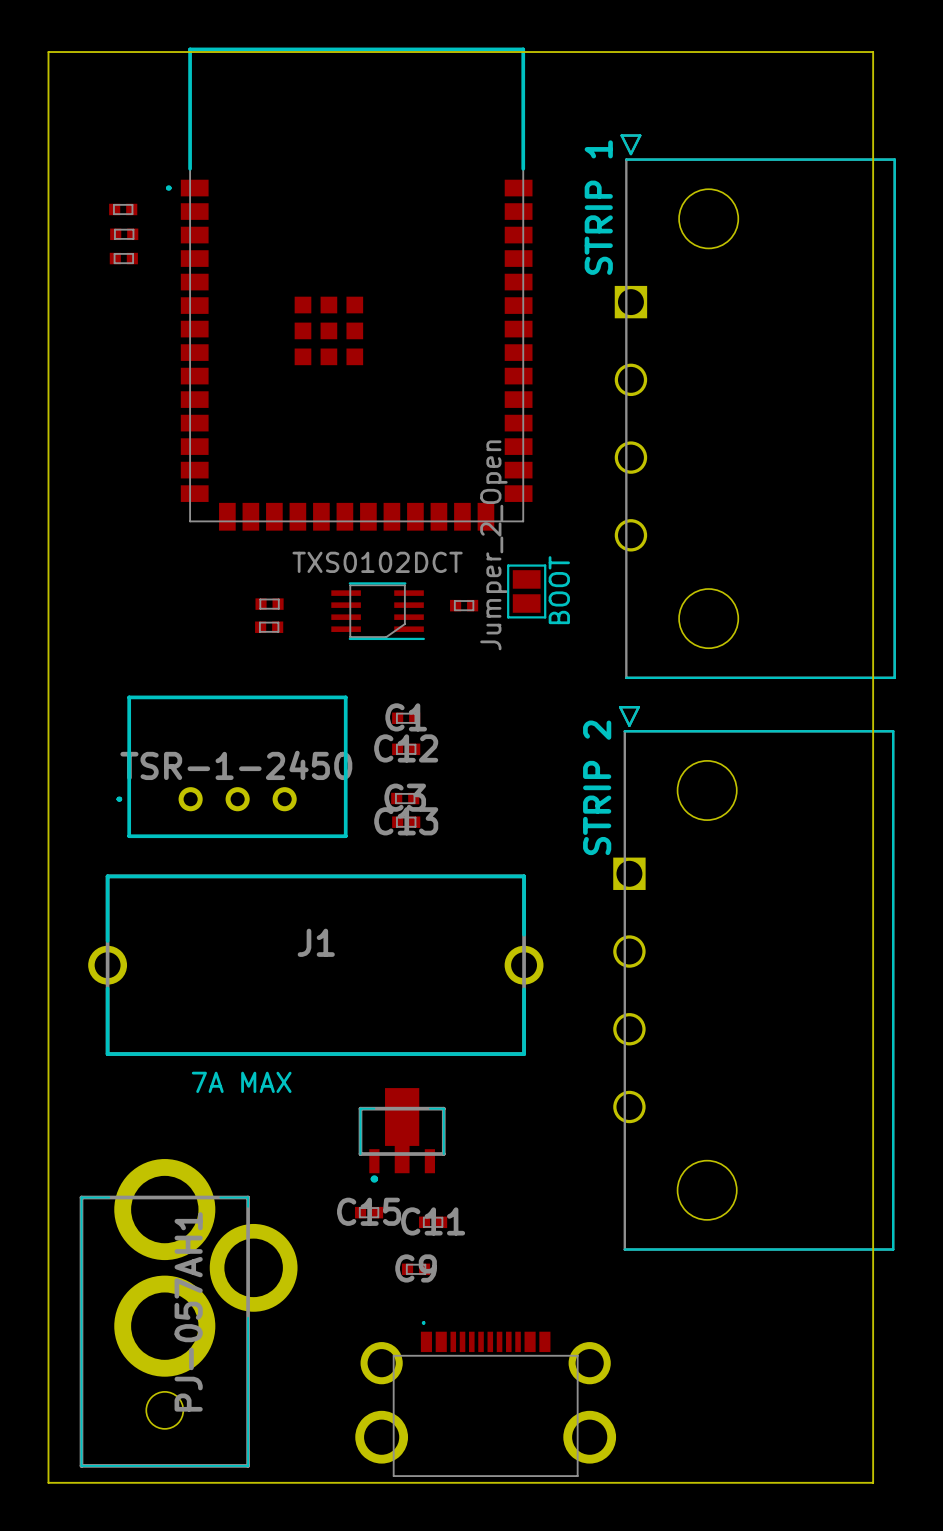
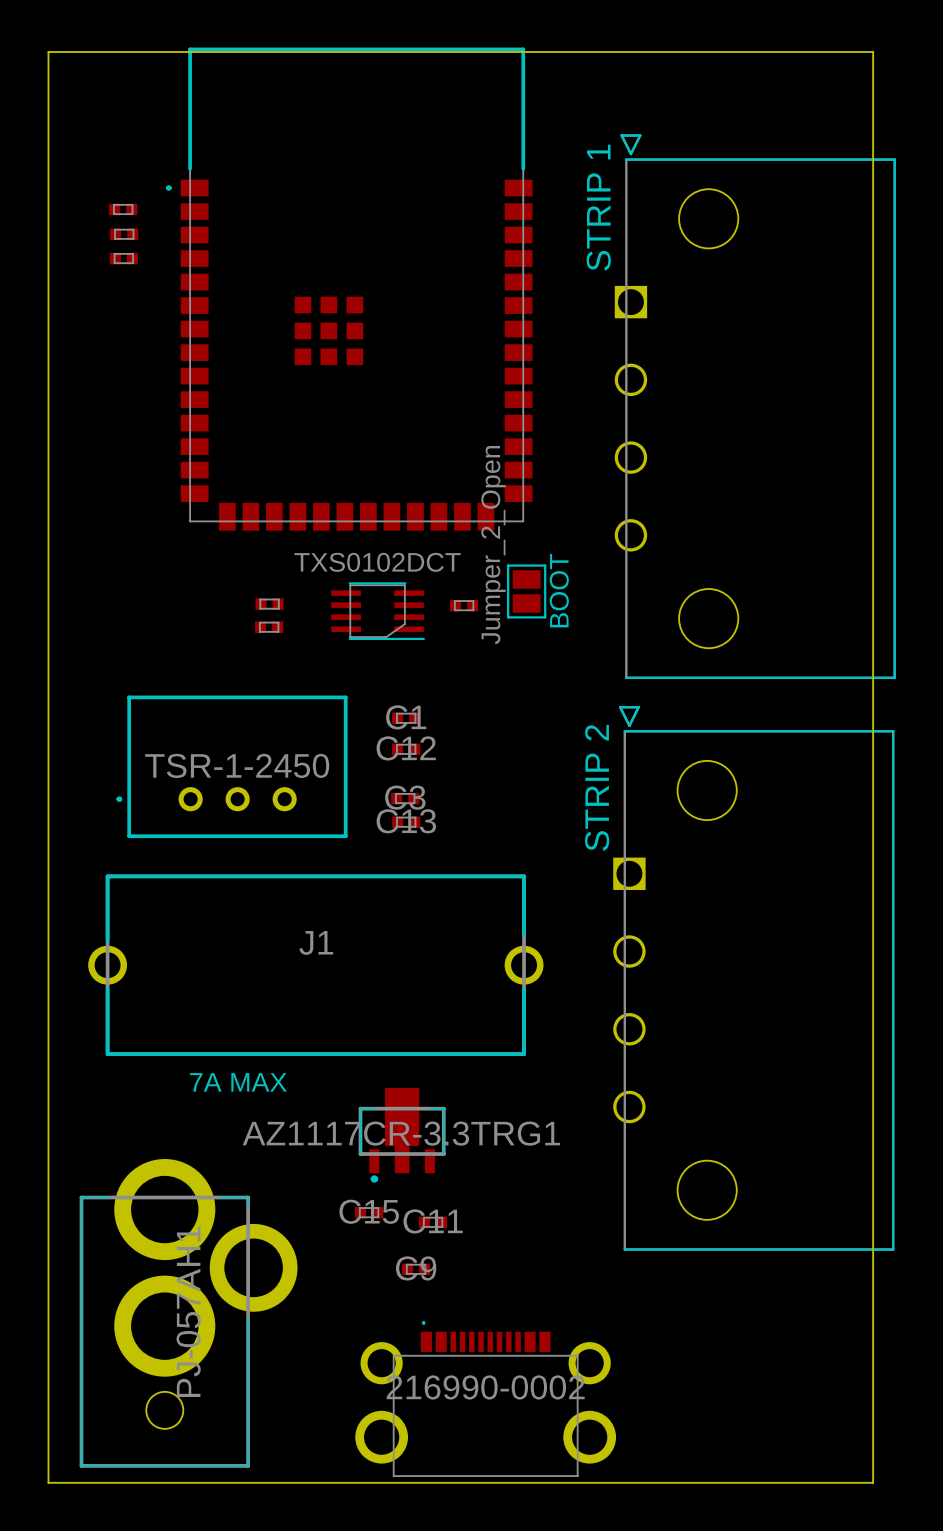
AZ1117CR-3.3TRG1 name: none -> AZ1117CR-3.3TRG1 (401, 1133)
216990-0002 name: none -> 216990-0002 (485, 1387)

